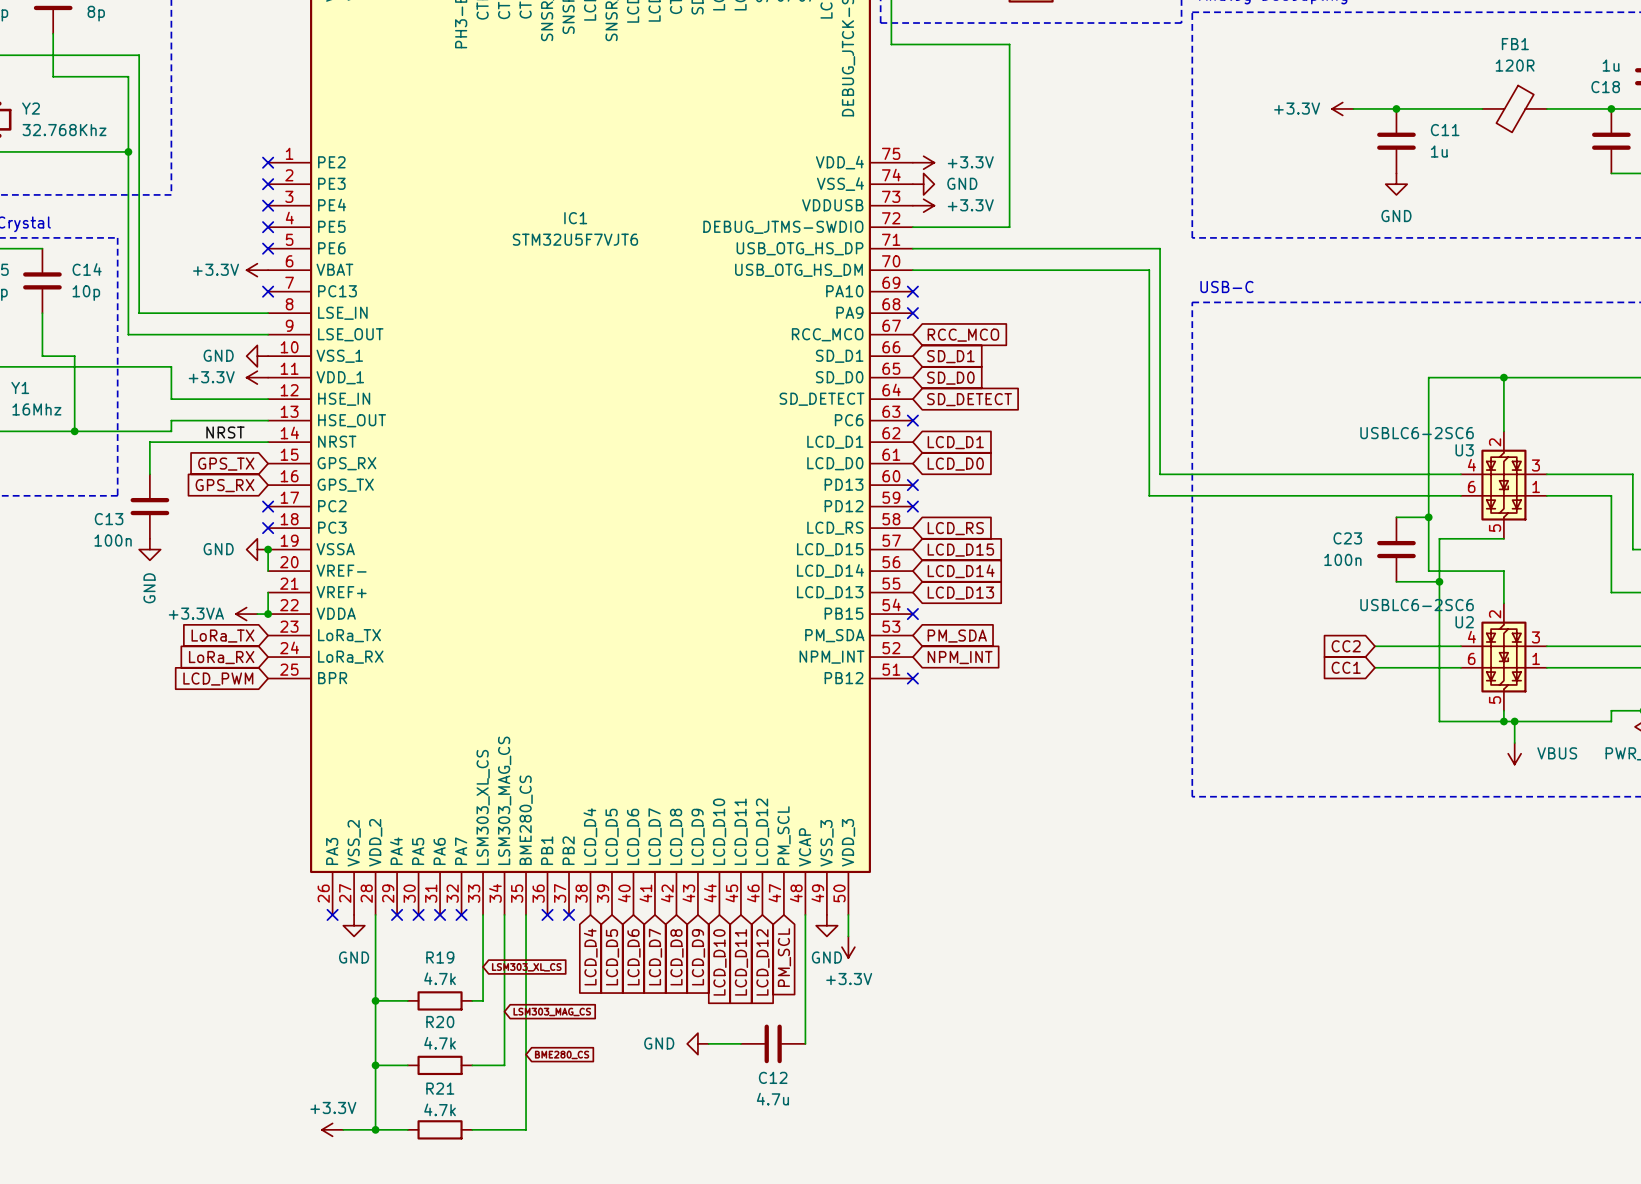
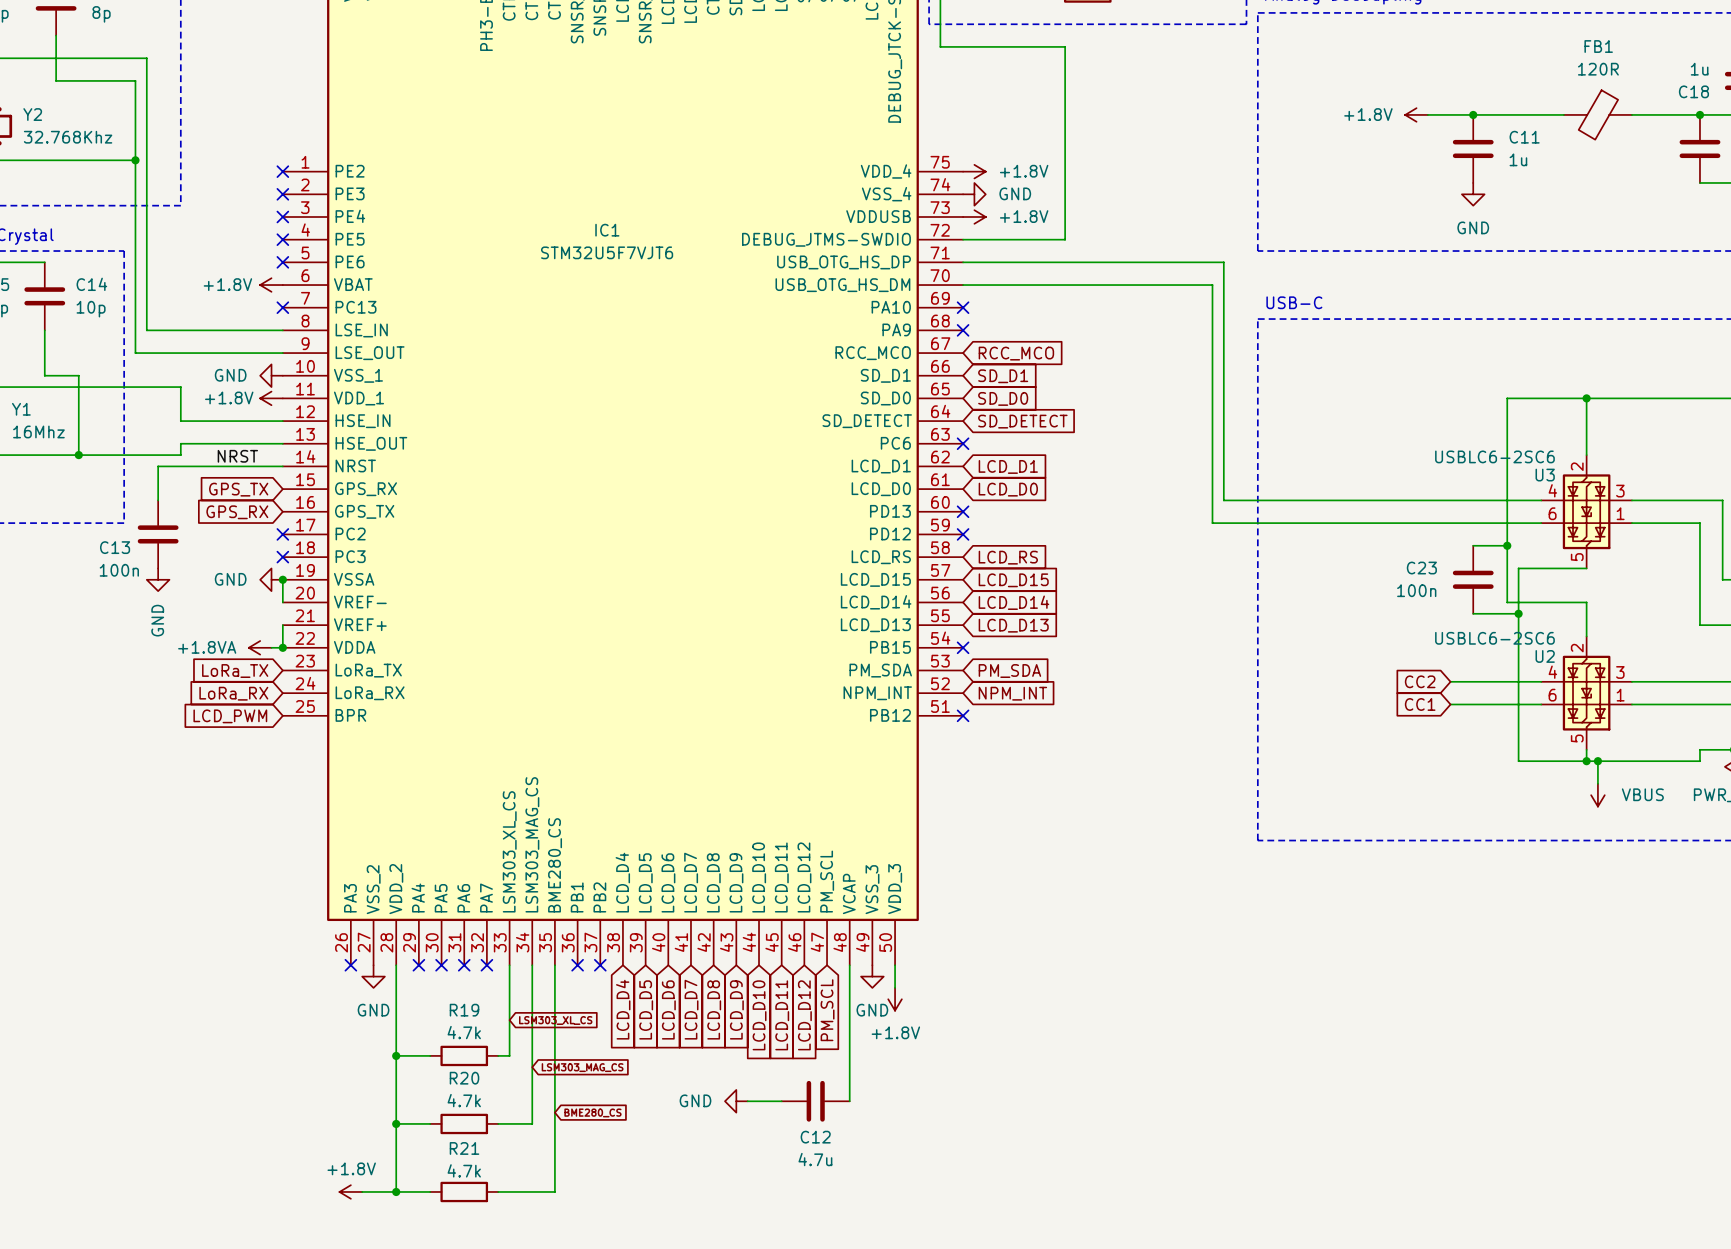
power symbol: +3.3V (1342, 108) -> +1.8V (1416, 114)
power symbol: +3.3V (923, 162) -> +1.8V (974, 171)
power symbol: +3.3V (923, 205) -> +1.8V (974, 217)
power symbol: +3.3V (257, 270) -> +1.8V (271, 285)
power symbol: +3.3V (257, 377) -> +1.8V (271, 398)
power symbol: +3.3VA (246, 614) -> +1.8VA (260, 647)
power symbol: +3.3V (848, 947) -> +1.8V (895, 999)
power symbol: +3.3V (332, 1129) -> +1.8V (350, 1191)

